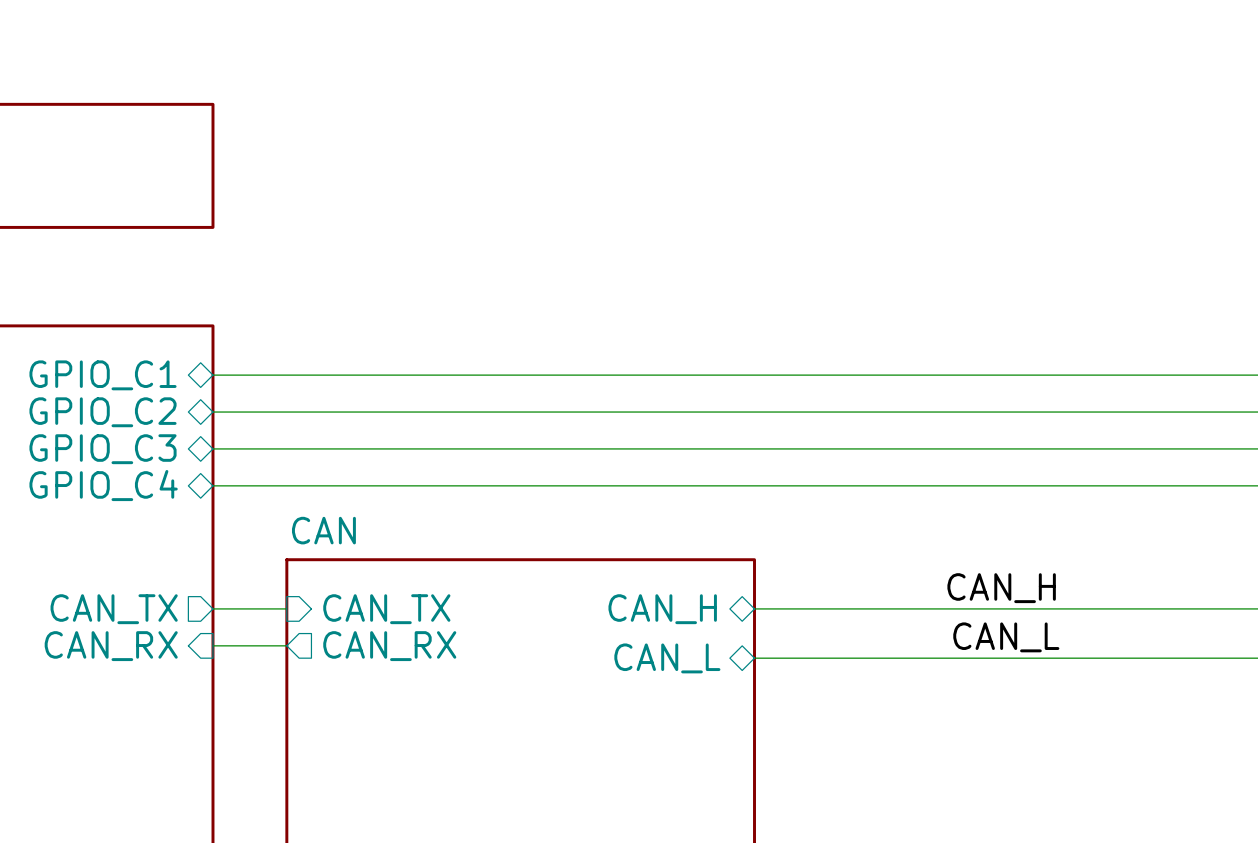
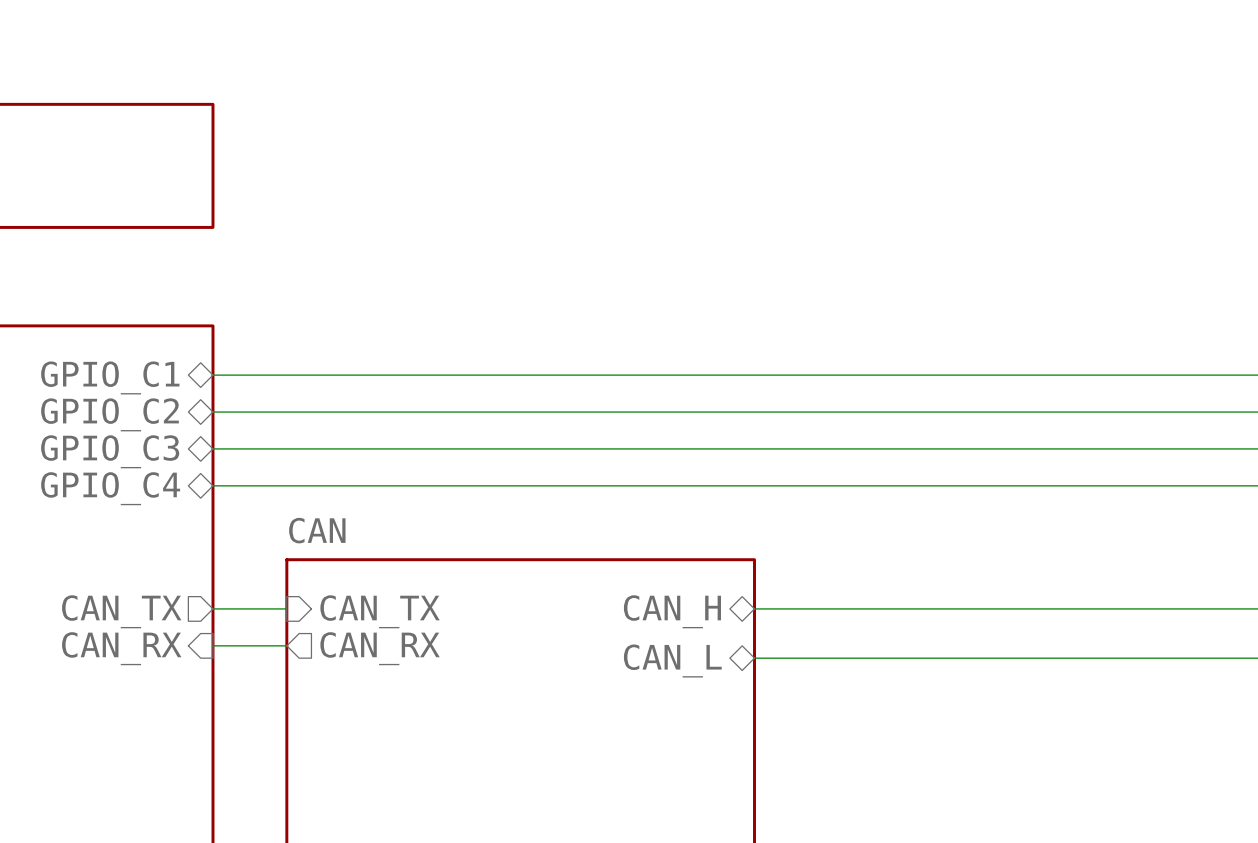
label: CAN_H (1001, 588) -> none
label: CAN_L (1006, 637) -> none

